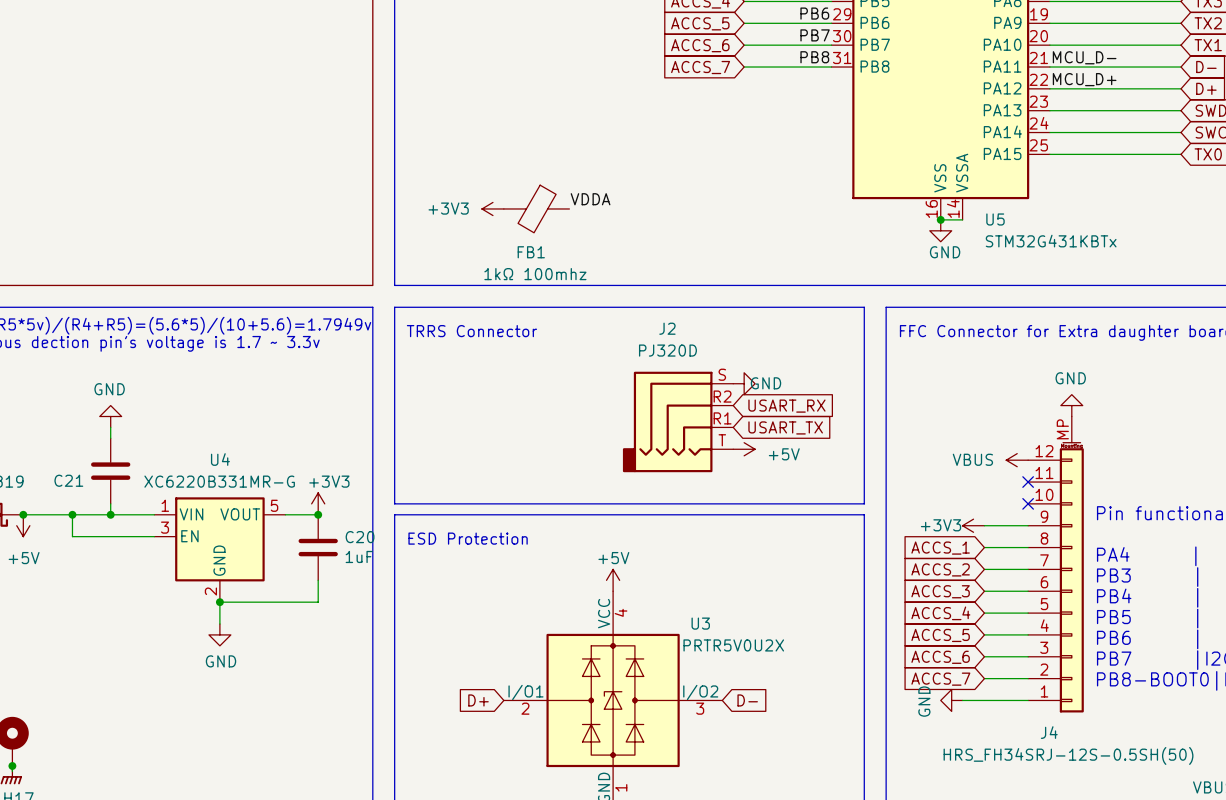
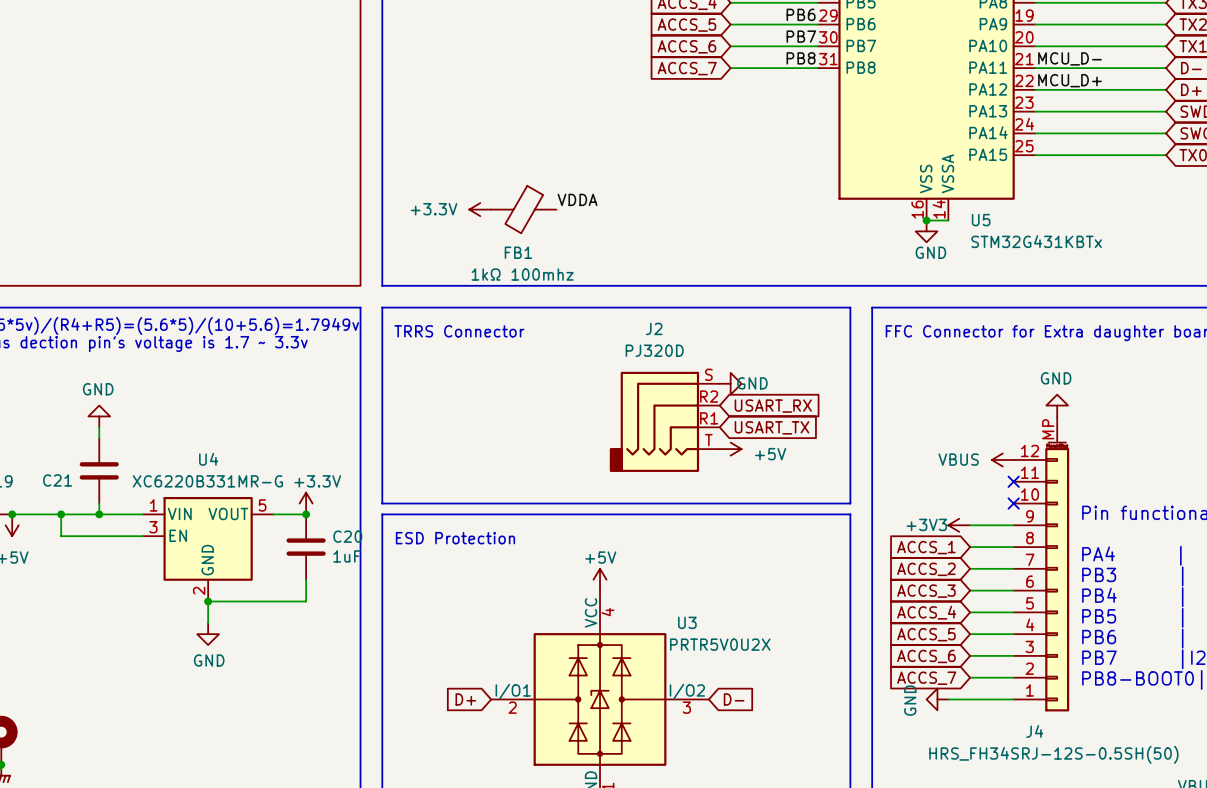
power symbol: +3V3 (492, 208) -> +3.3V (480, 209)
power symbol: +3V3 (318, 503) -> +3.3V (306, 503)

